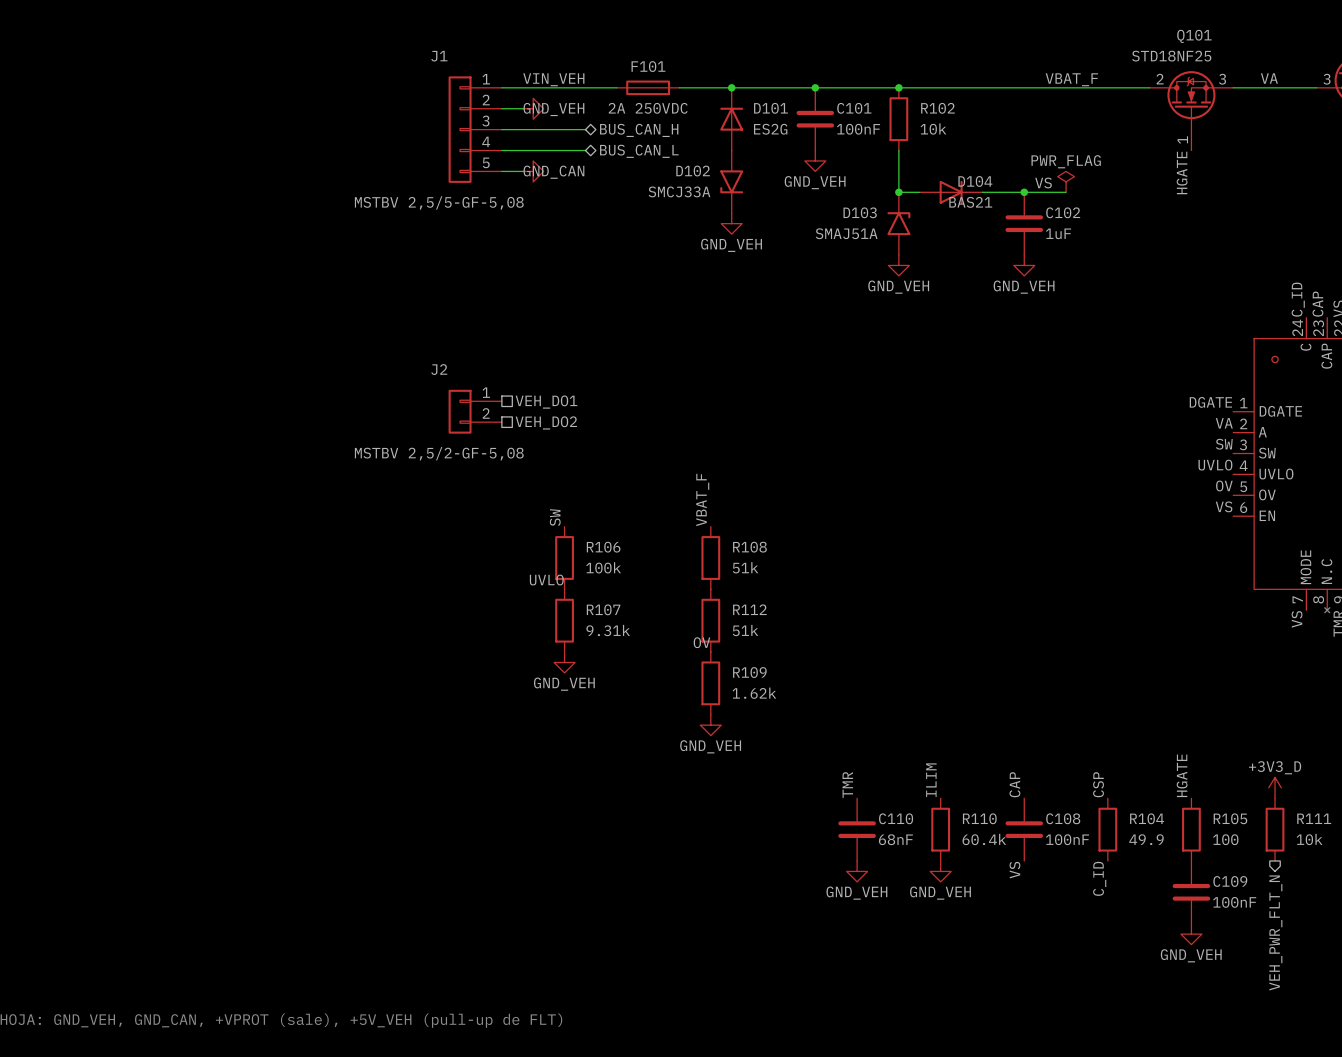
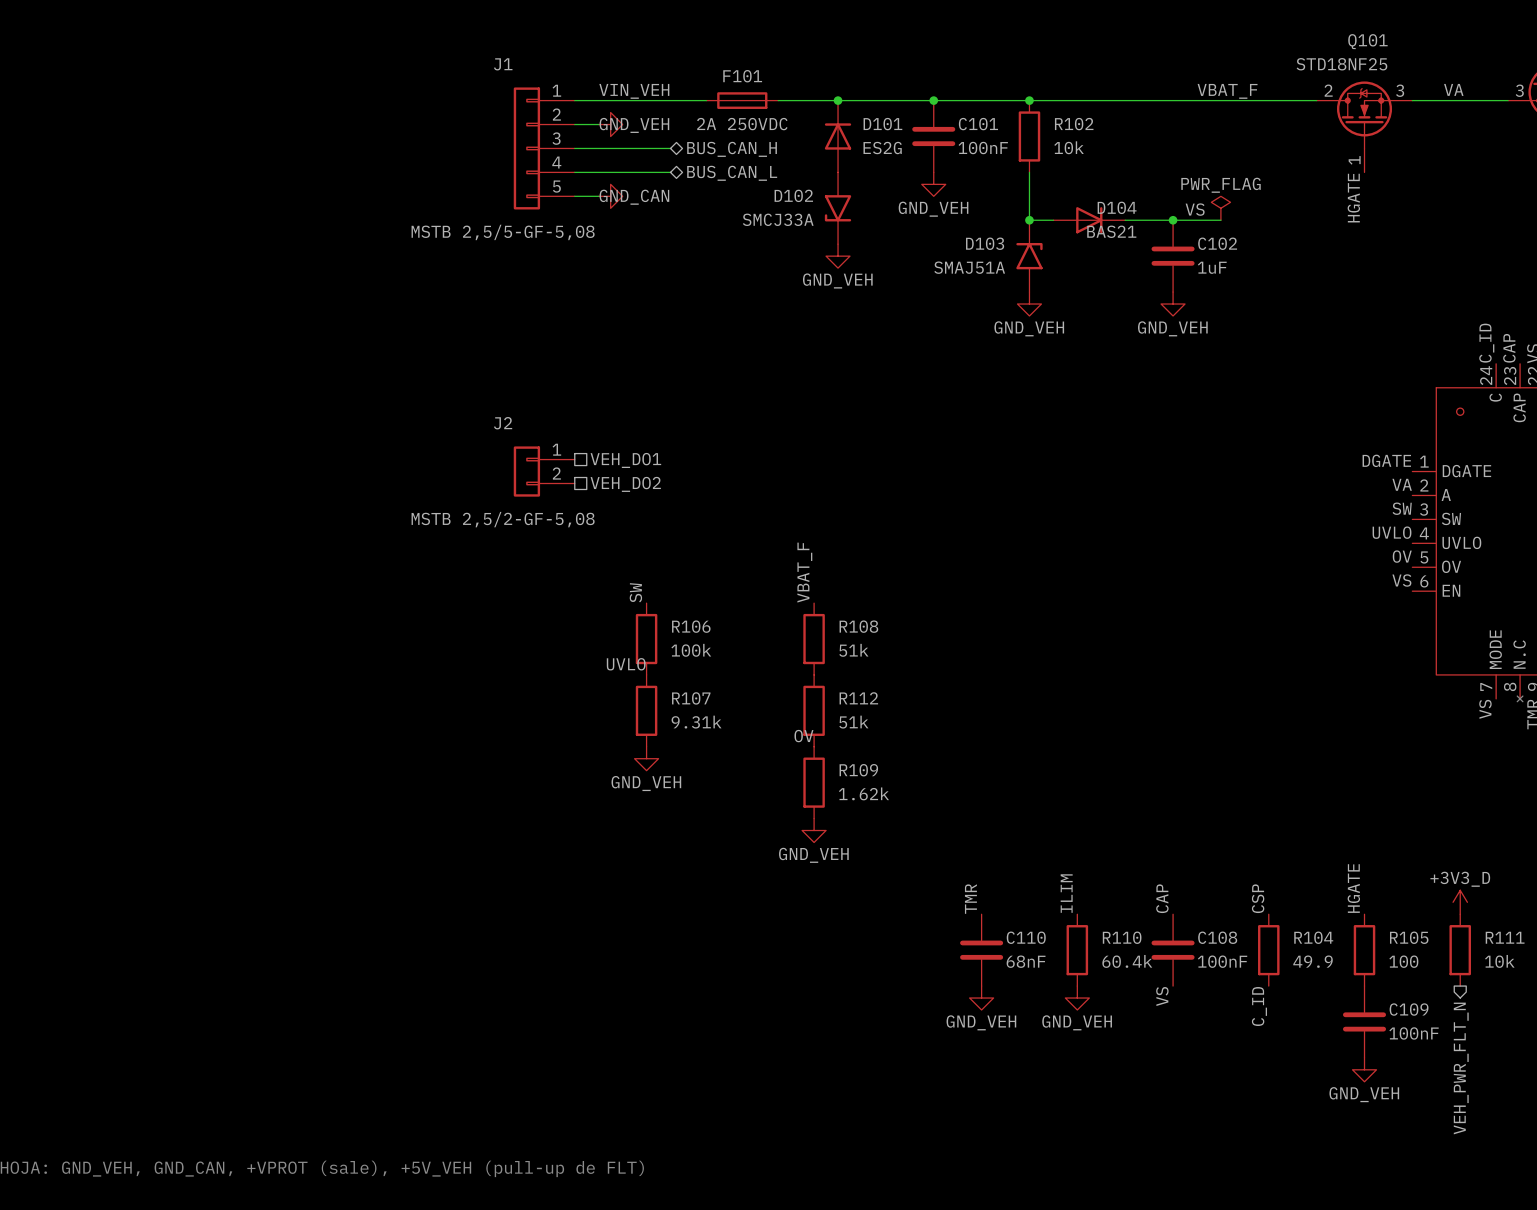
J1 value: MSTBV 2,5/5-GF-5,08 (439, 202) -> MSTB 2,5/5-GF-5,08 (503, 232)
J2 value: MSTBV 2,5/2-GF-5,08 (439, 453) -> MSTB 2,5/2-GF-5,08 (503, 519)

